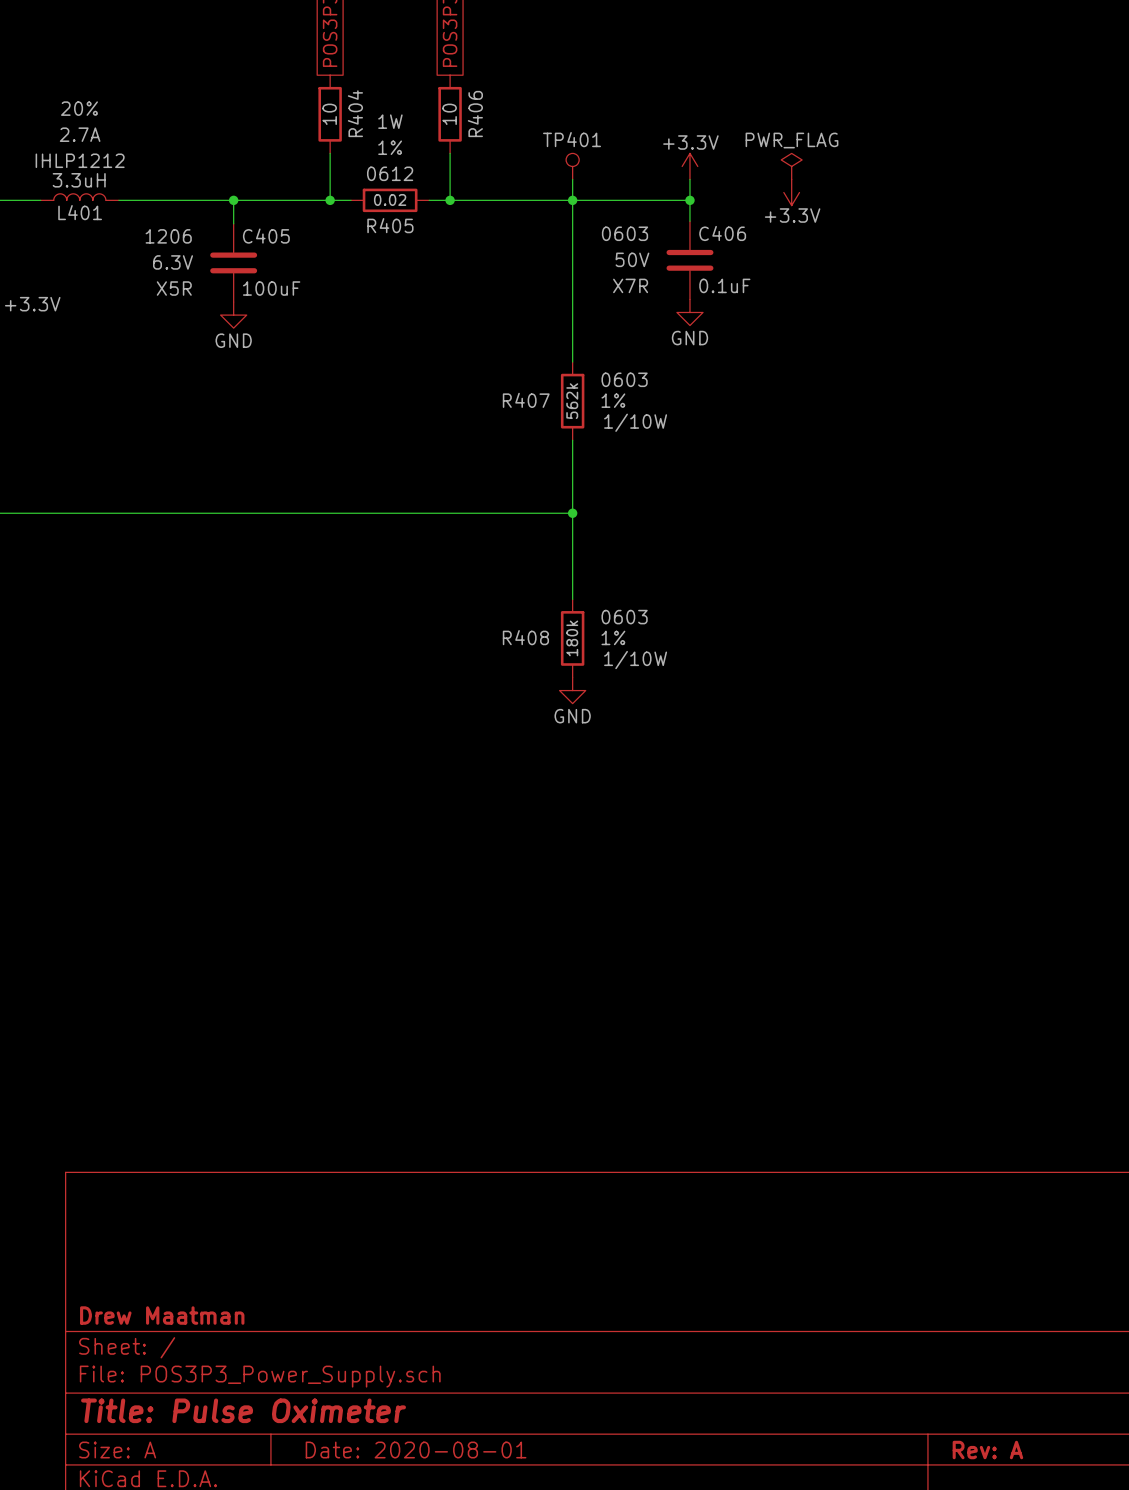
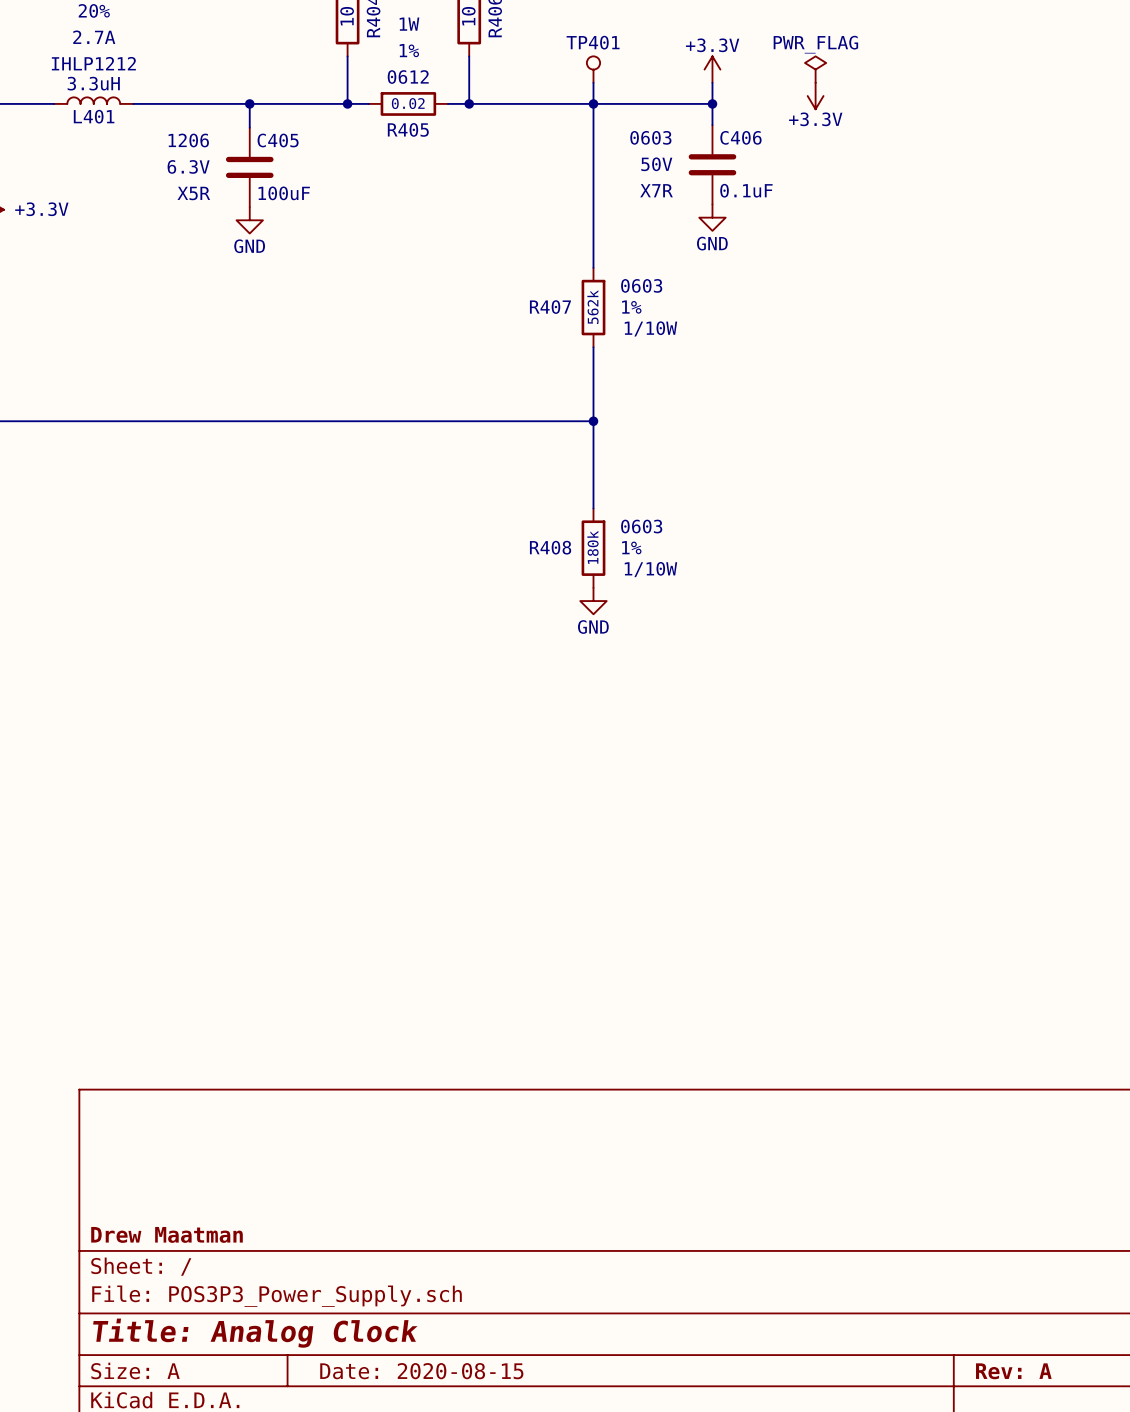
title block: Title: Pulse Oximeter (243, 1410) -> Title: Analog Clock (255, 1333)
title block: Date: 2020-08-01 (416, 1450) -> Date: 2020-08-15 (421, 1371)

